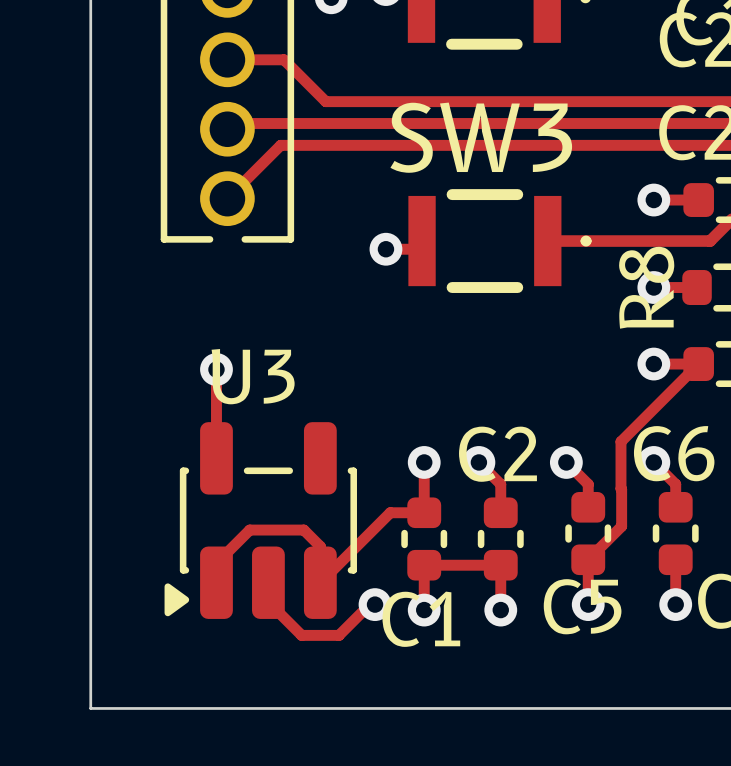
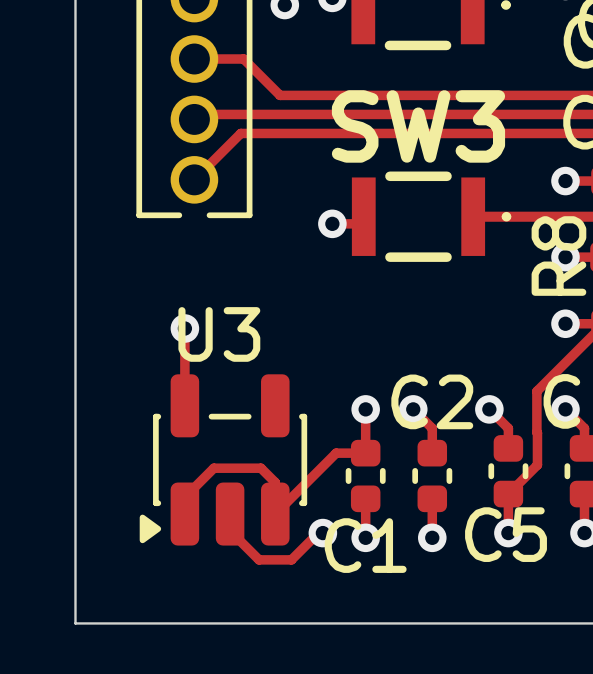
track: (424, 565) (500, 565) -> none

